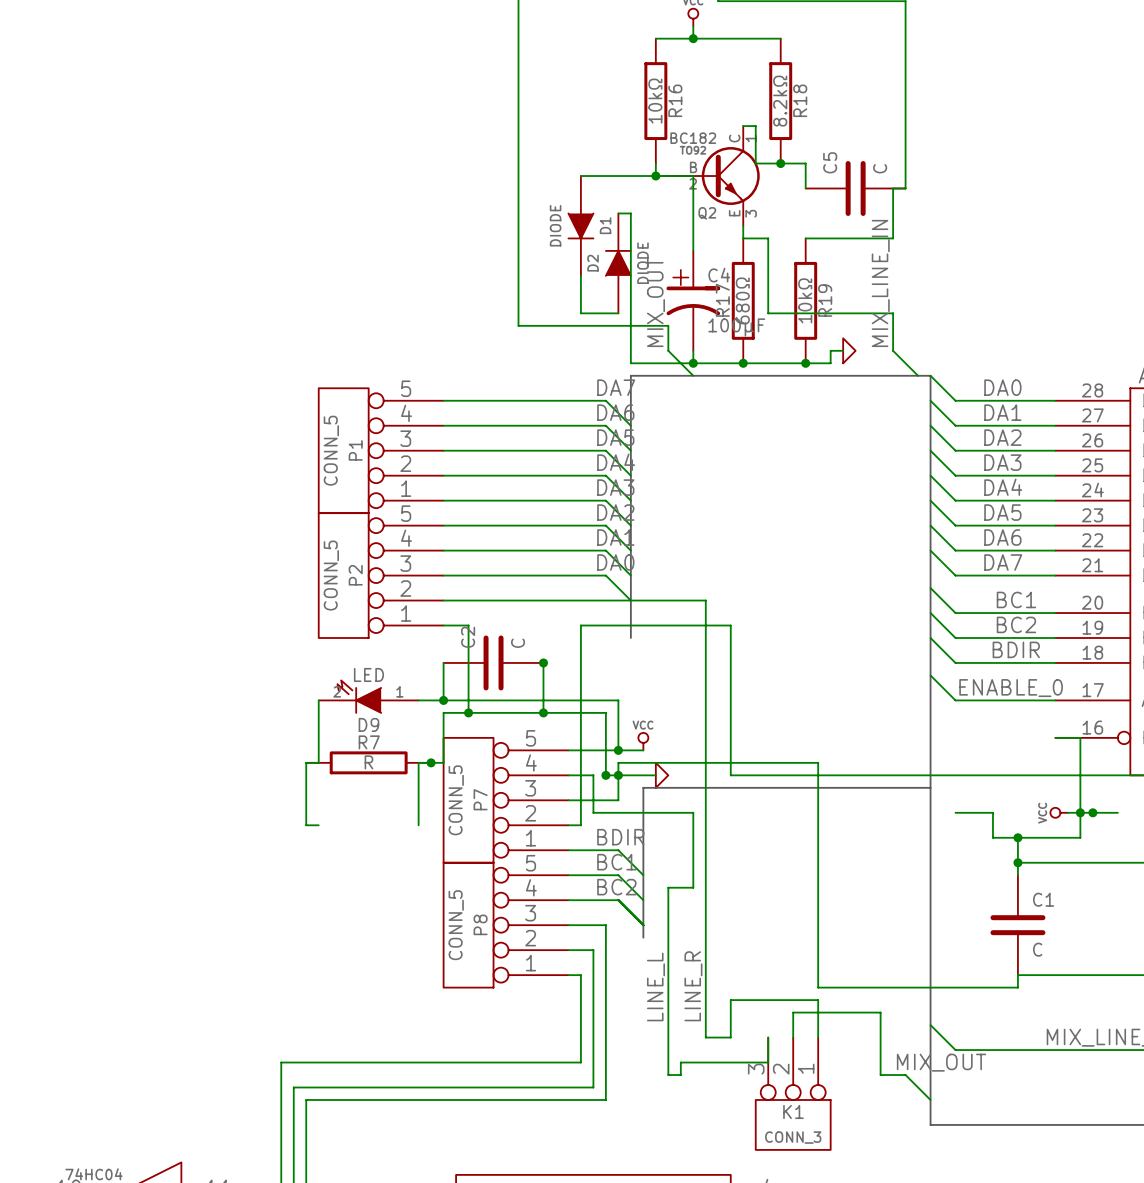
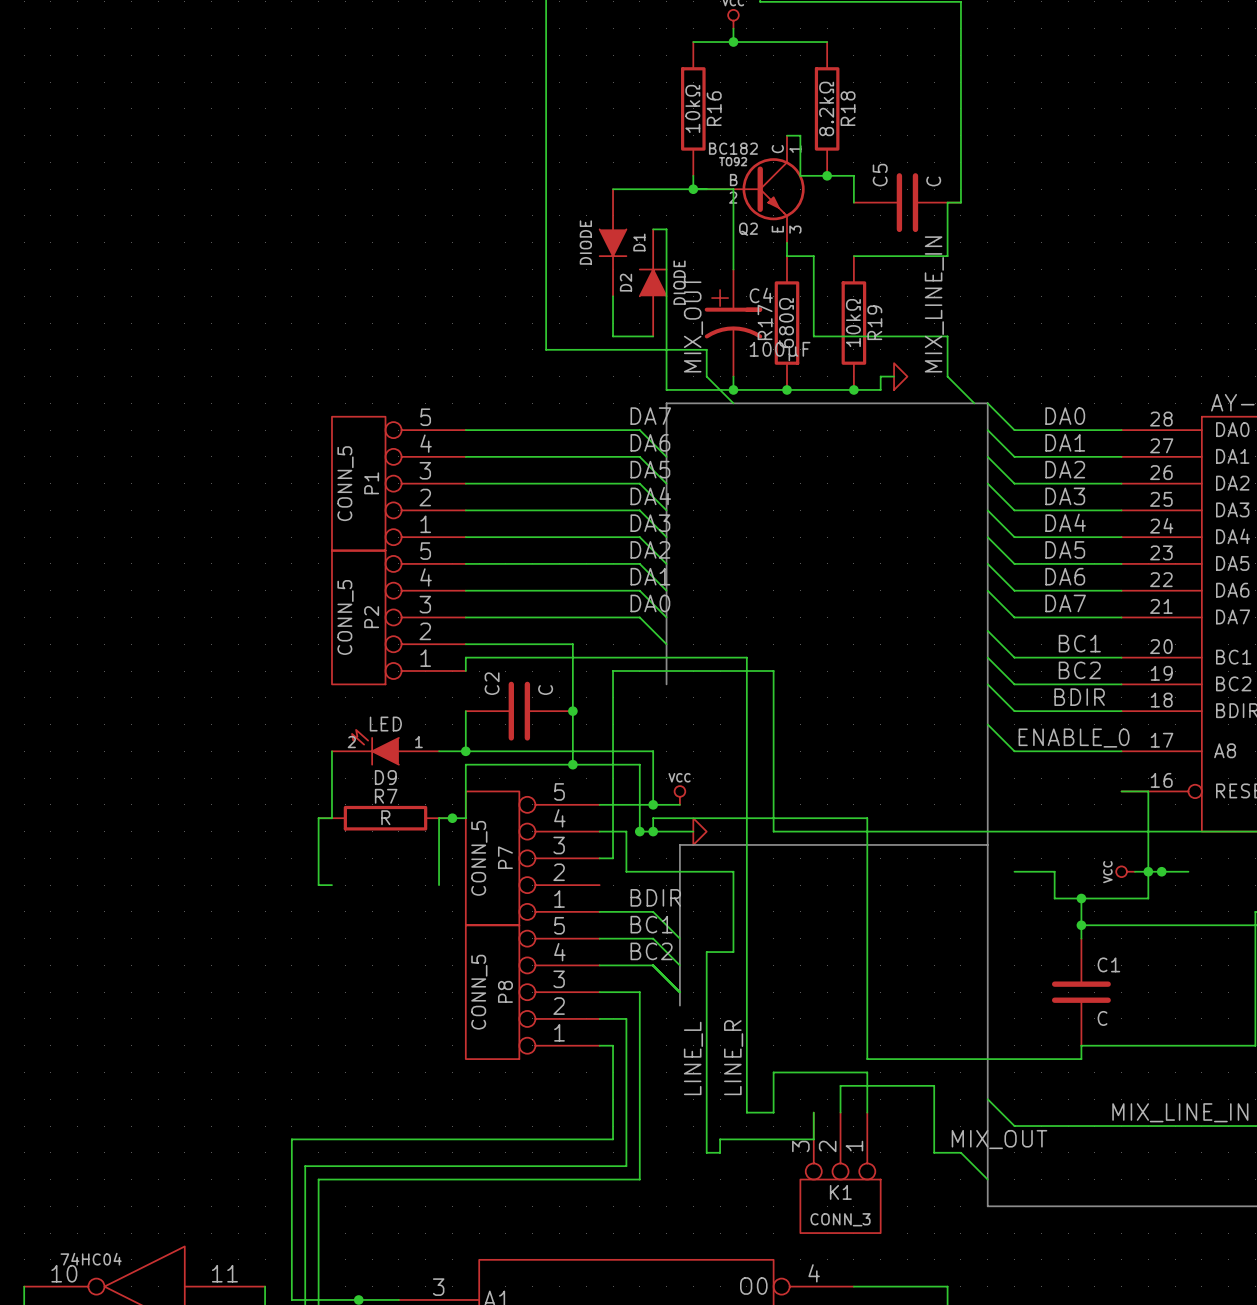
wire: (543, 600) (705, 600) (705, 613) -> (465, 671) (465, 657) (746, 657)
wire: none -> (572, 644) (572, 711)
wire: (443, 625) (468, 625) (468, 712) -> none
junction: (468, 712) -> none
wire: (618, 775) (618, 800) (580, 800) (580, 825) (568, 825) -> none

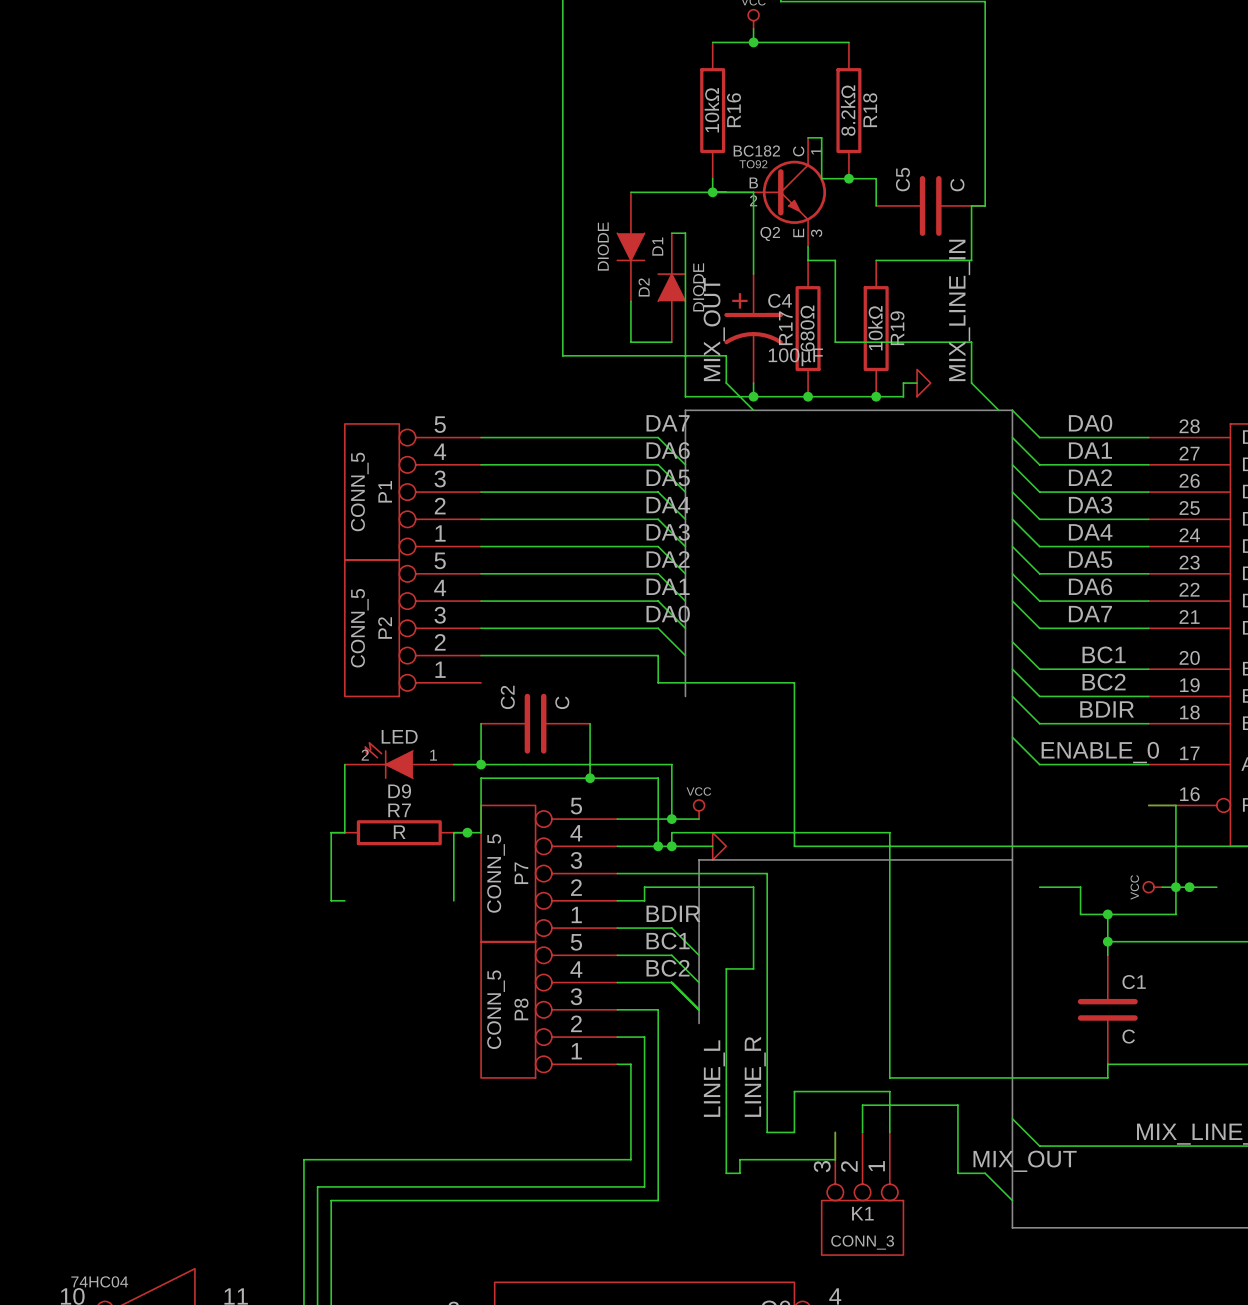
wire: (572, 644) (572, 711) -> (590, 655) (658, 655) (658, 682)
wire: (465, 671) (465, 657) (746, 657) (746, 858) -> none
wire: (639, 671) (613, 671) (613, 858) -> (767, 873) (630, 873)
junction: (572, 711) -> none
wire: (626, 831) (626, 871) -> (644, 846) (658, 846)
wire: none -> (644, 887) (644, 900) (617, 900)

